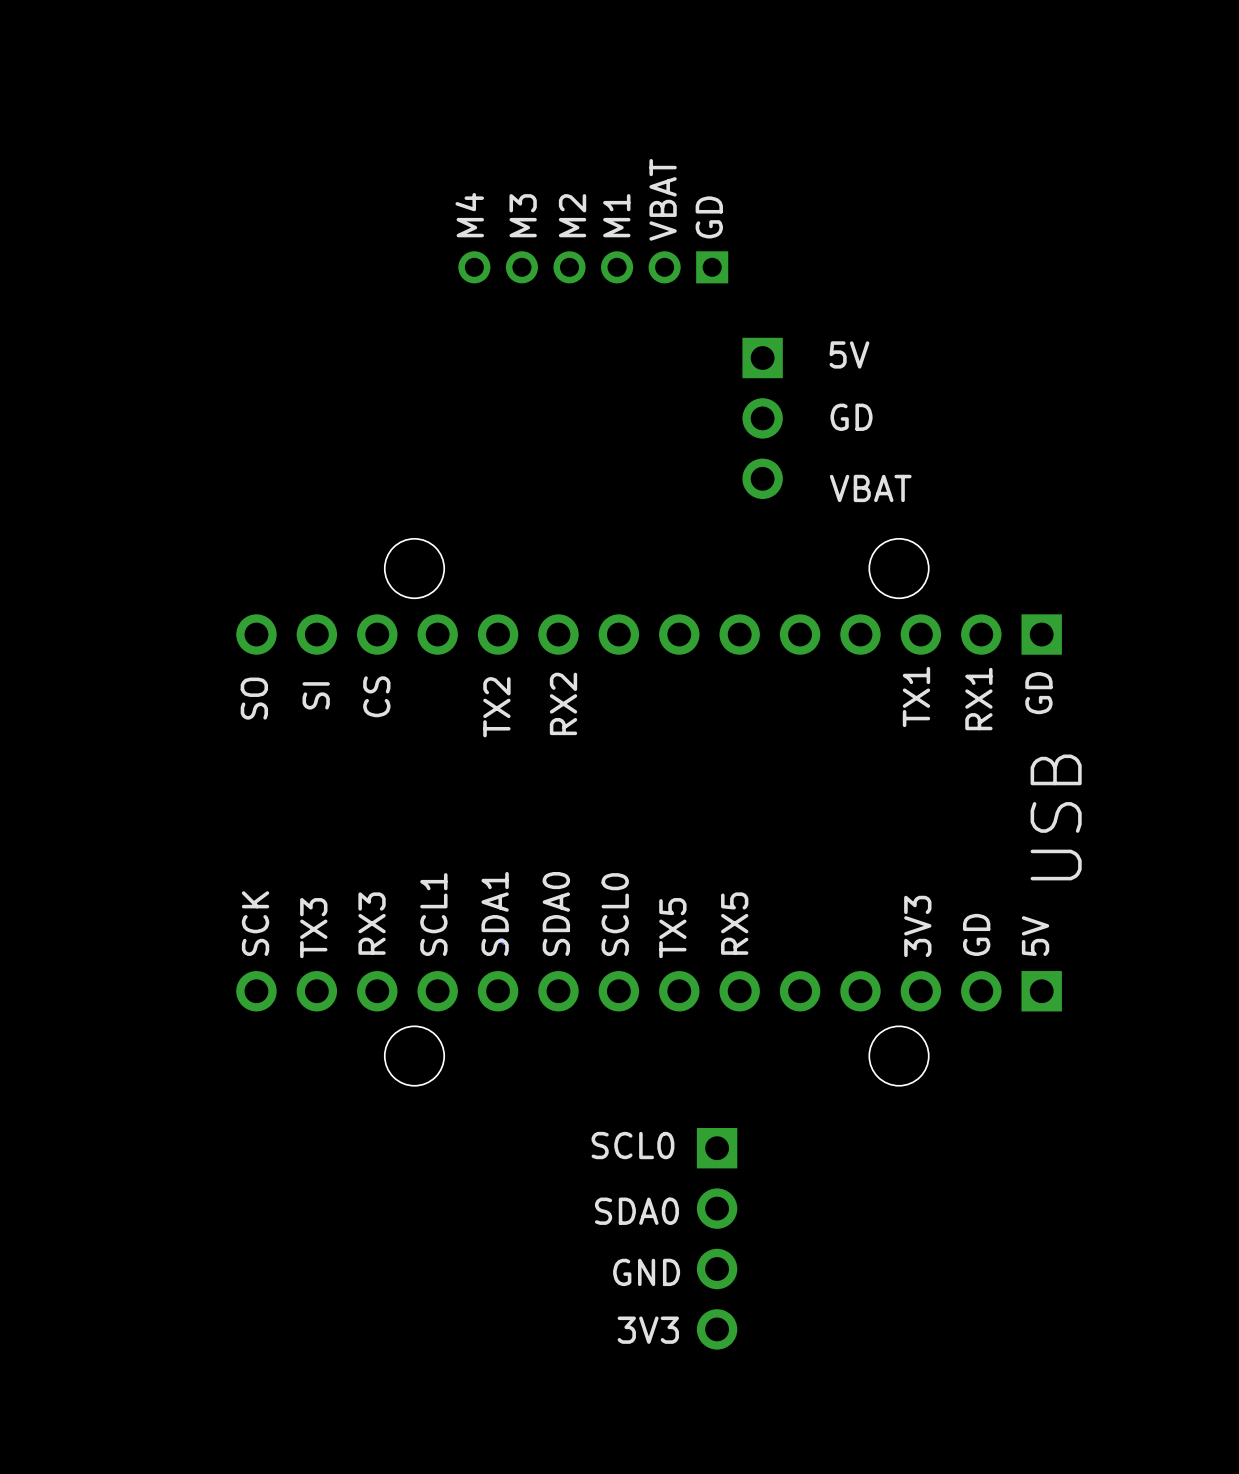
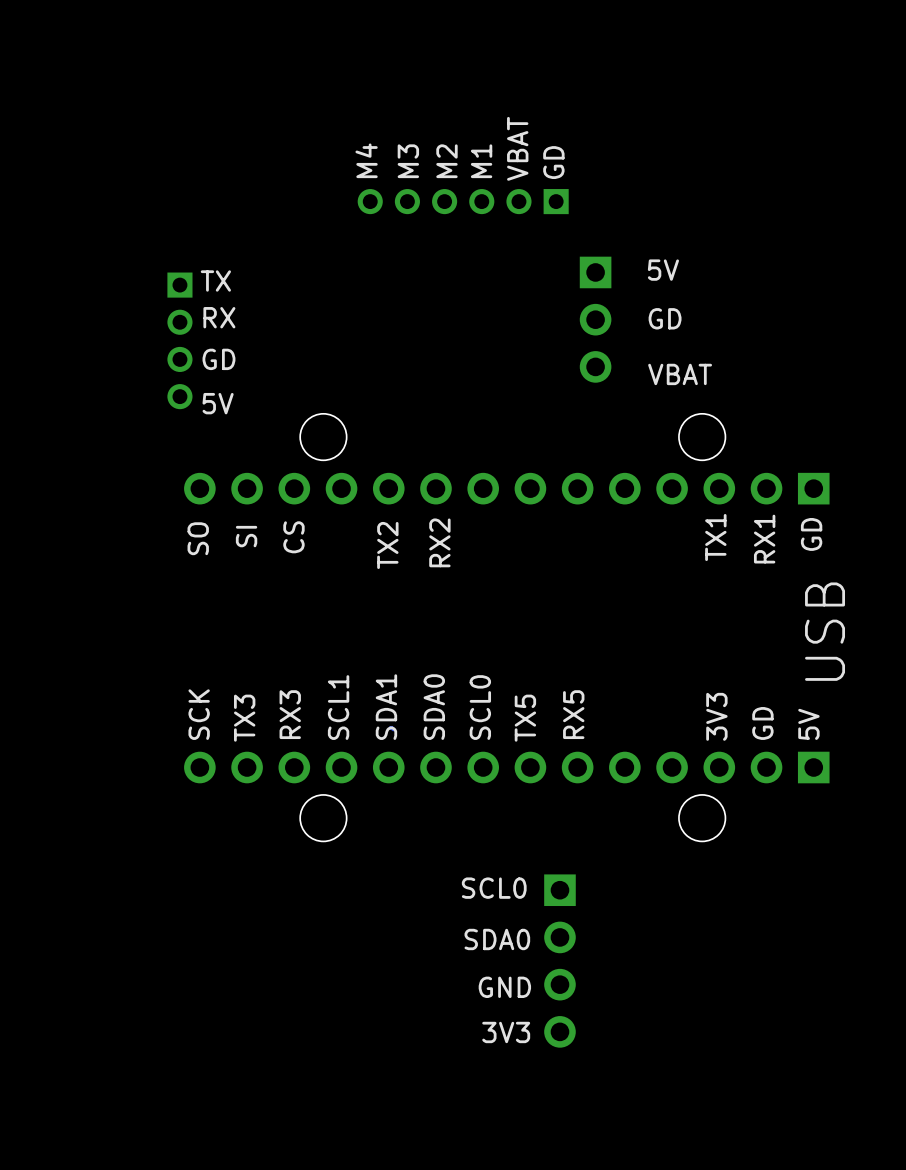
text: none -> TX (215, 281)
text: none -> RX (219, 317)
part: none -> (179, 340)
text: none -> GD (218, 359)
text: none -> 5V (218, 403)

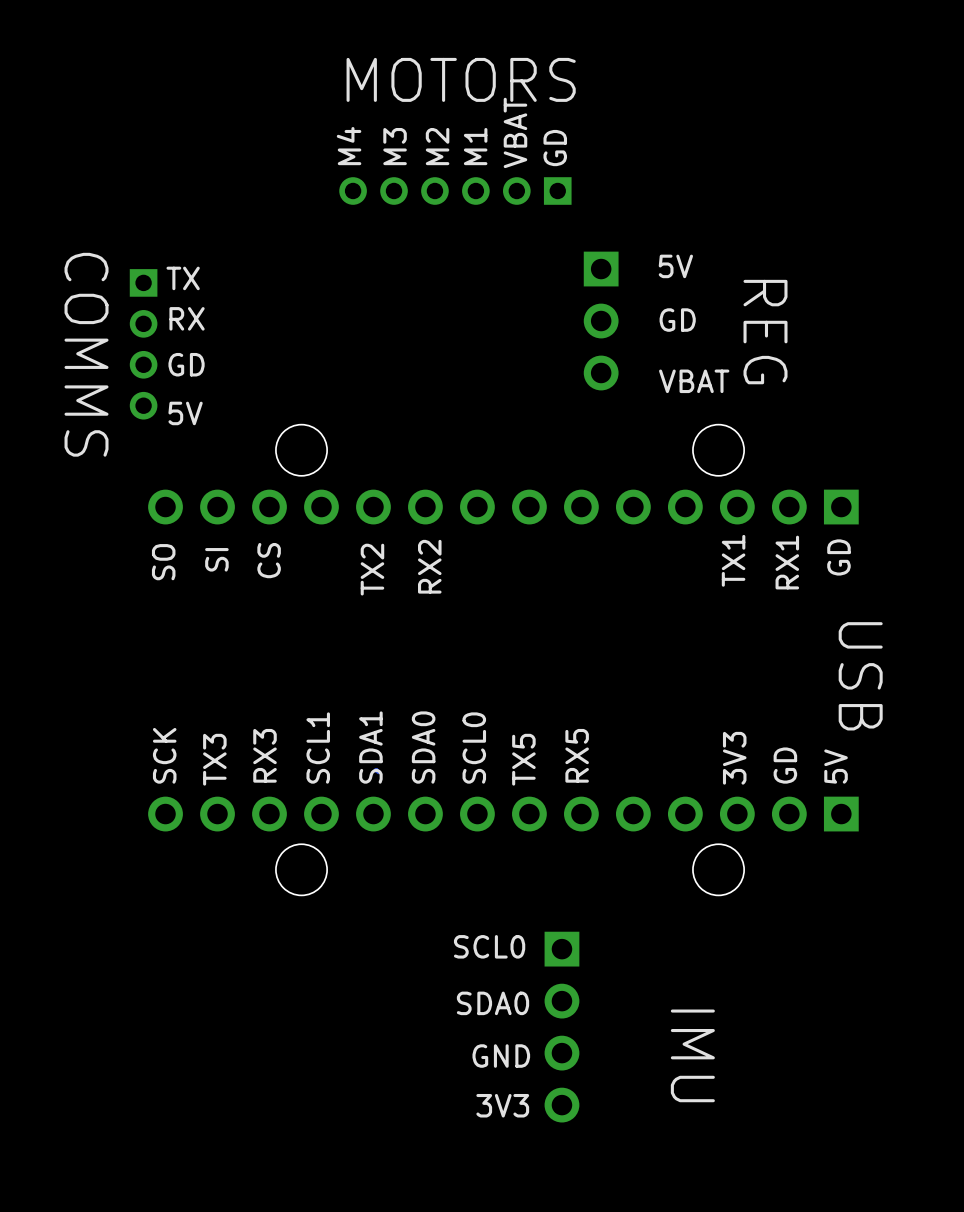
text: none -> MOTORS (461, 79)
text: none -> REG (765, 332)
text: none -> COMMS (86, 354)
text rotation: 0° (825, 631) -> 180° (860, 676)
text: none -> IMU (692, 1055)

